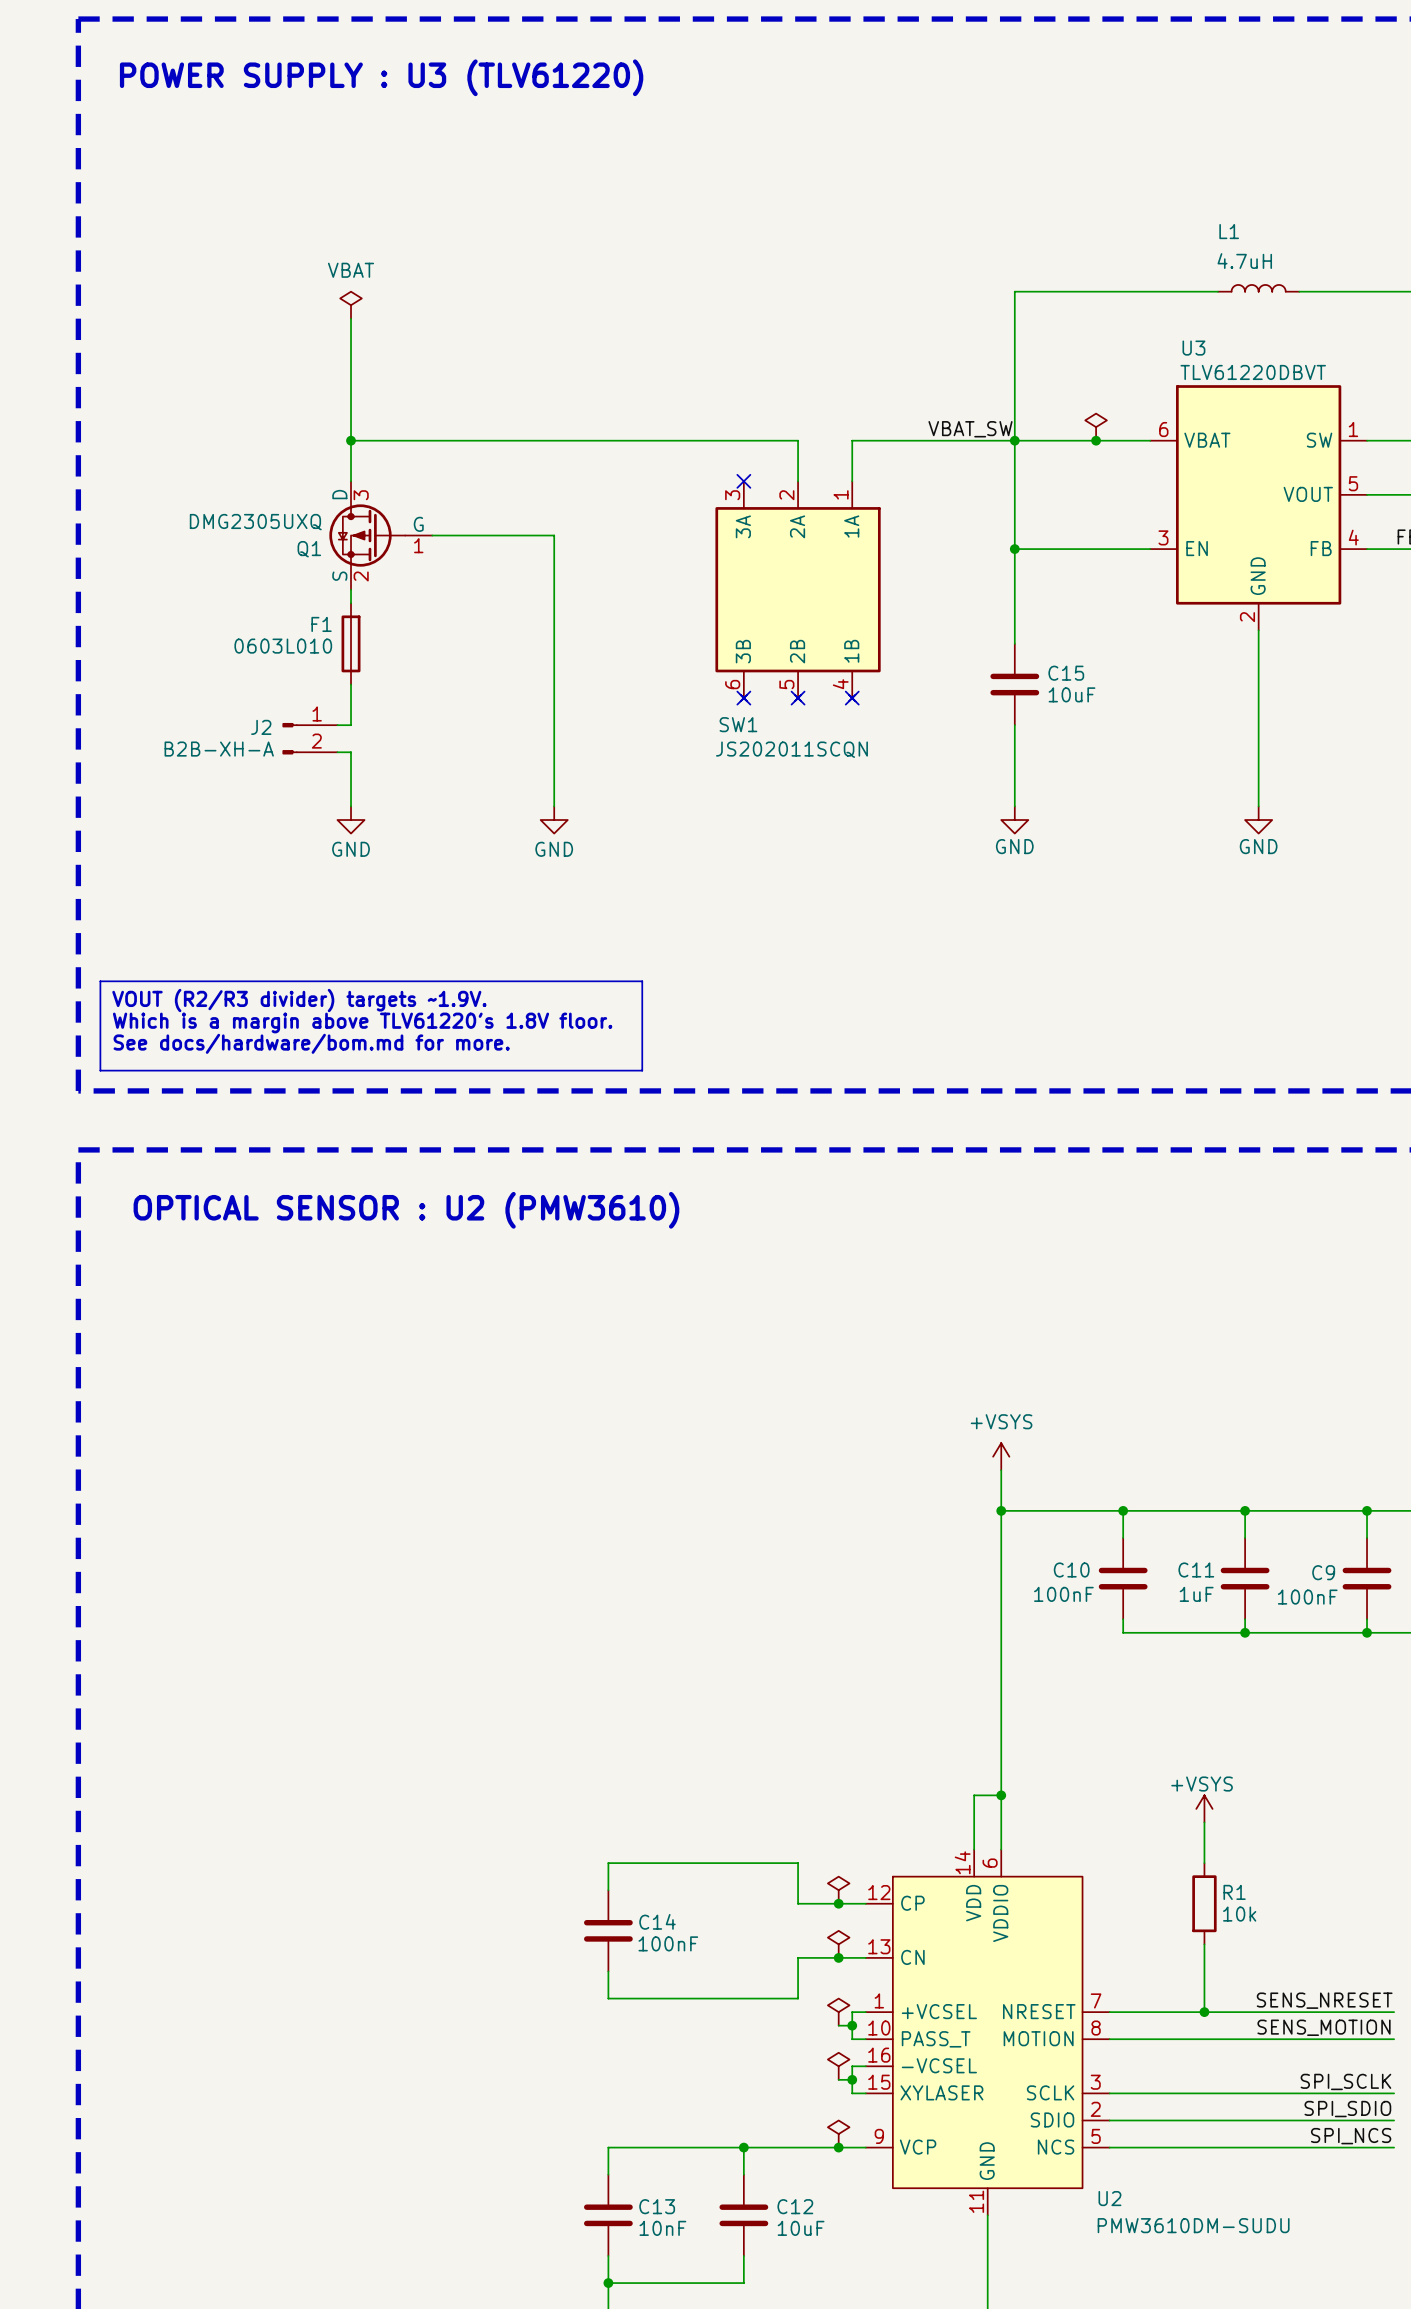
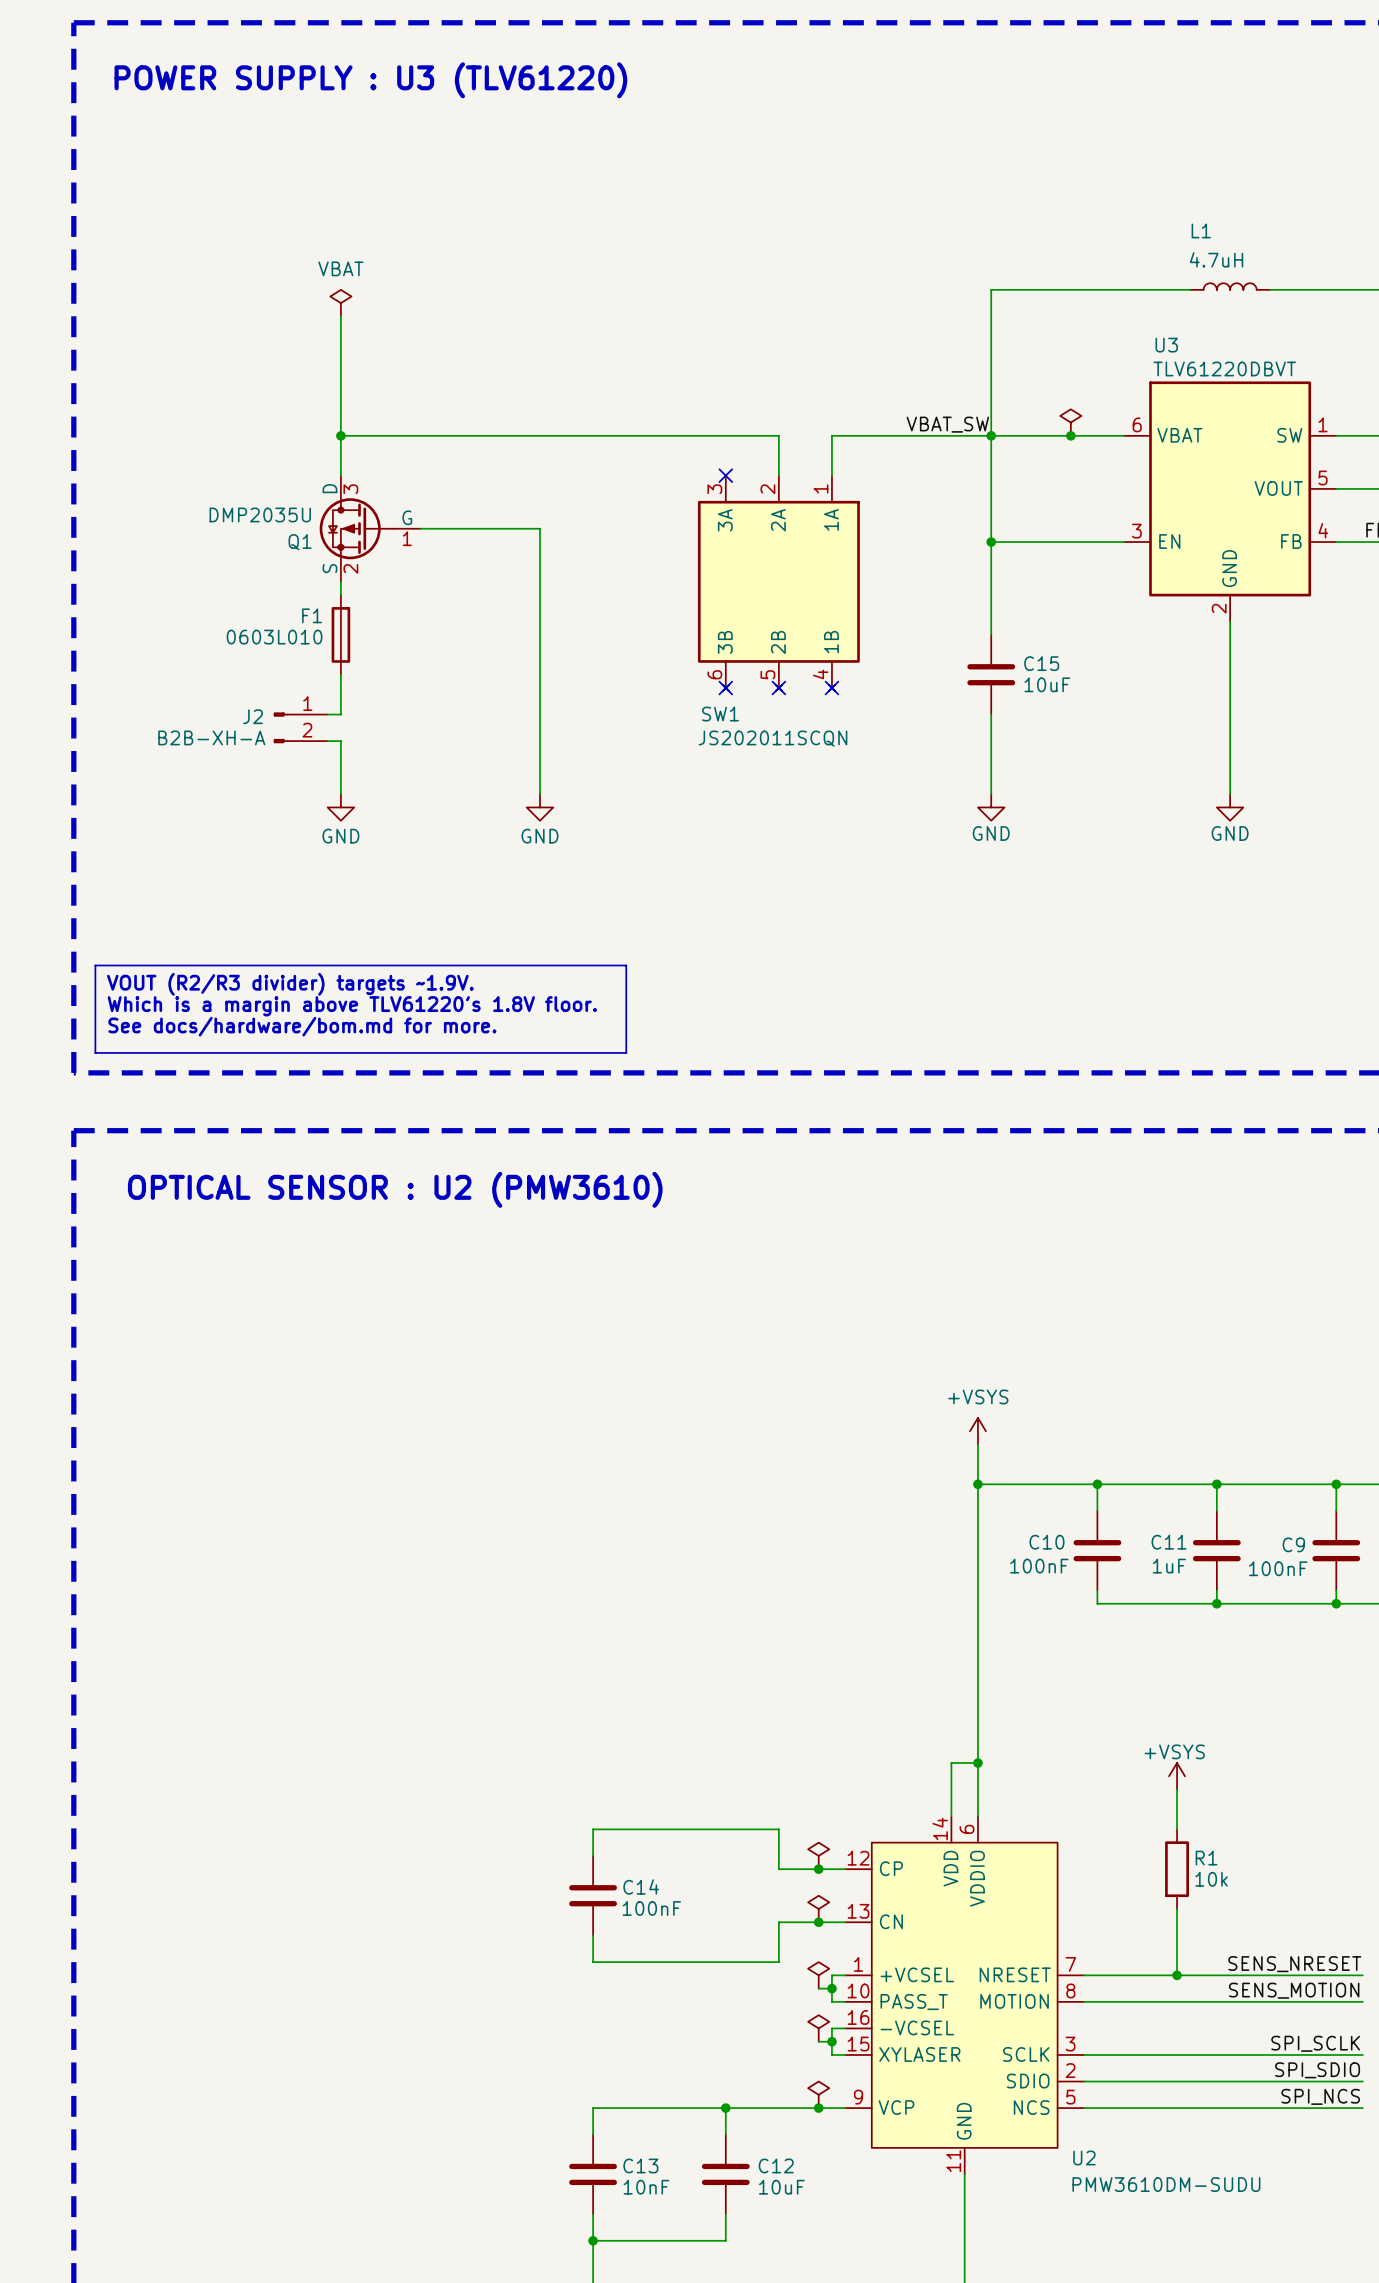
Q1 value: DMG2305UXQ (255, 522) -> DMP2035U (260, 514)

